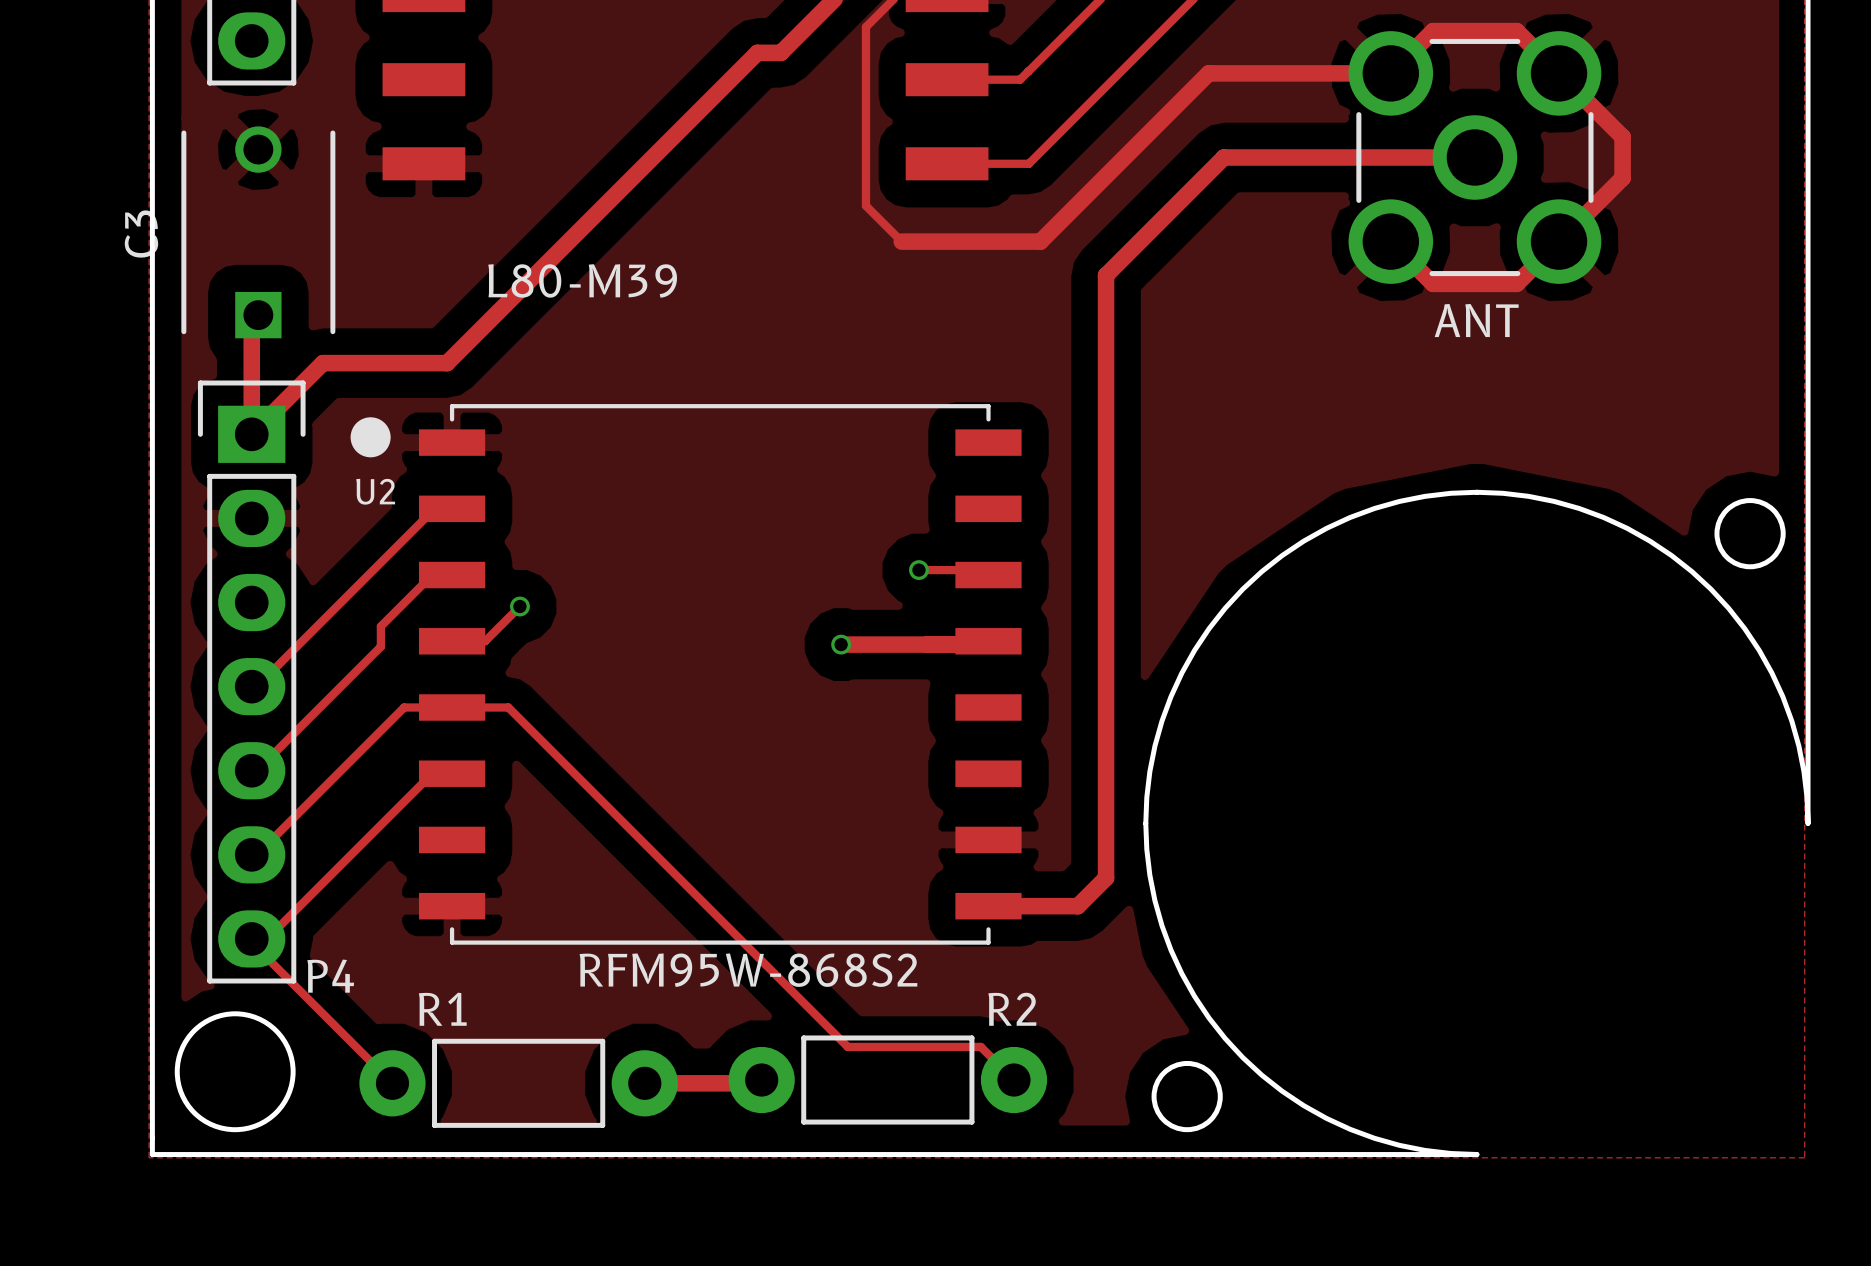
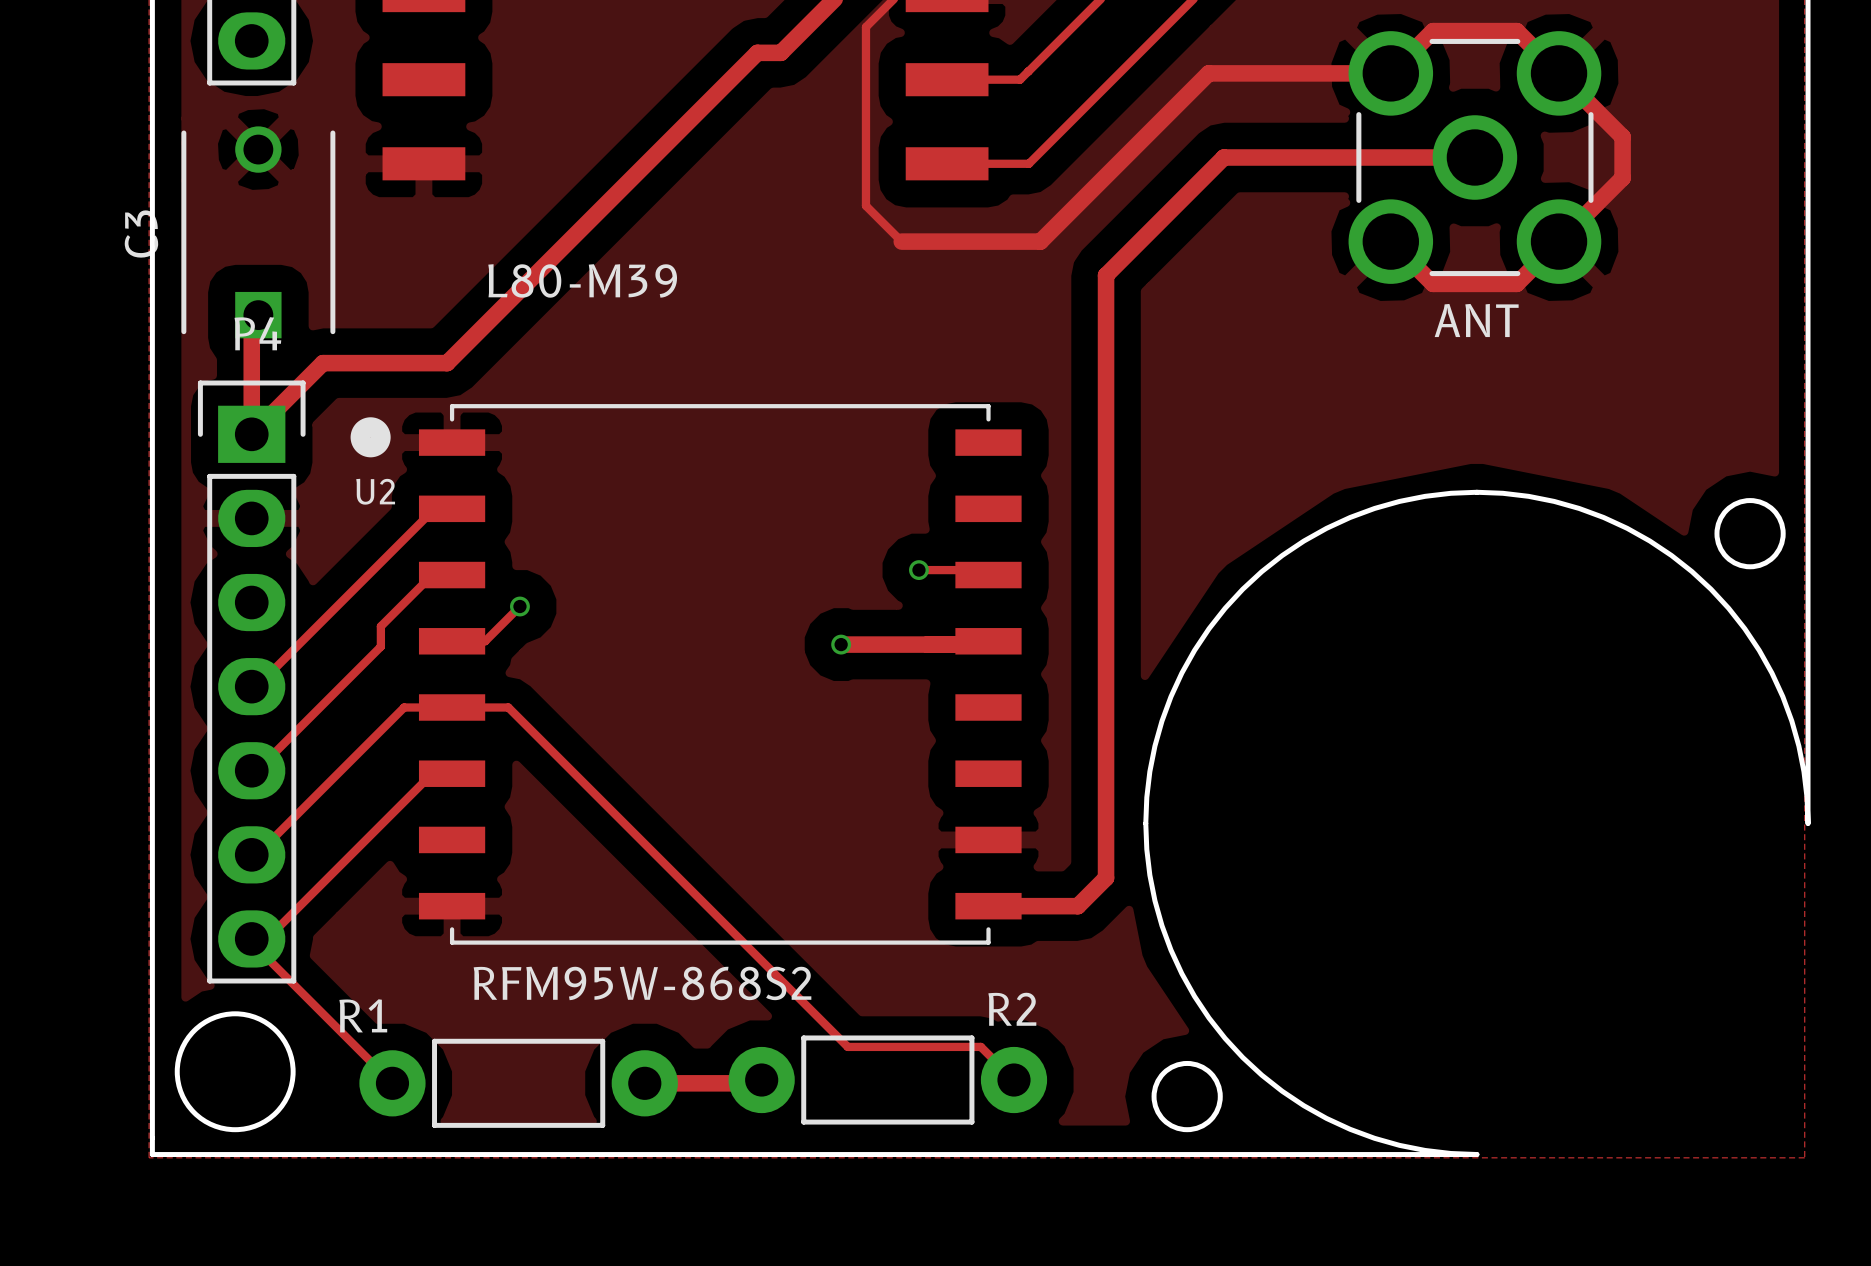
U2 value position: RFM95W-868S2 (748, 970) -> RFM95W-868S2 (642, 983)
P4 name position: P4 (330, 976) -> P4 (257, 333)
R1 name position: R1 (442, 1009) -> R1 (363, 1015)

